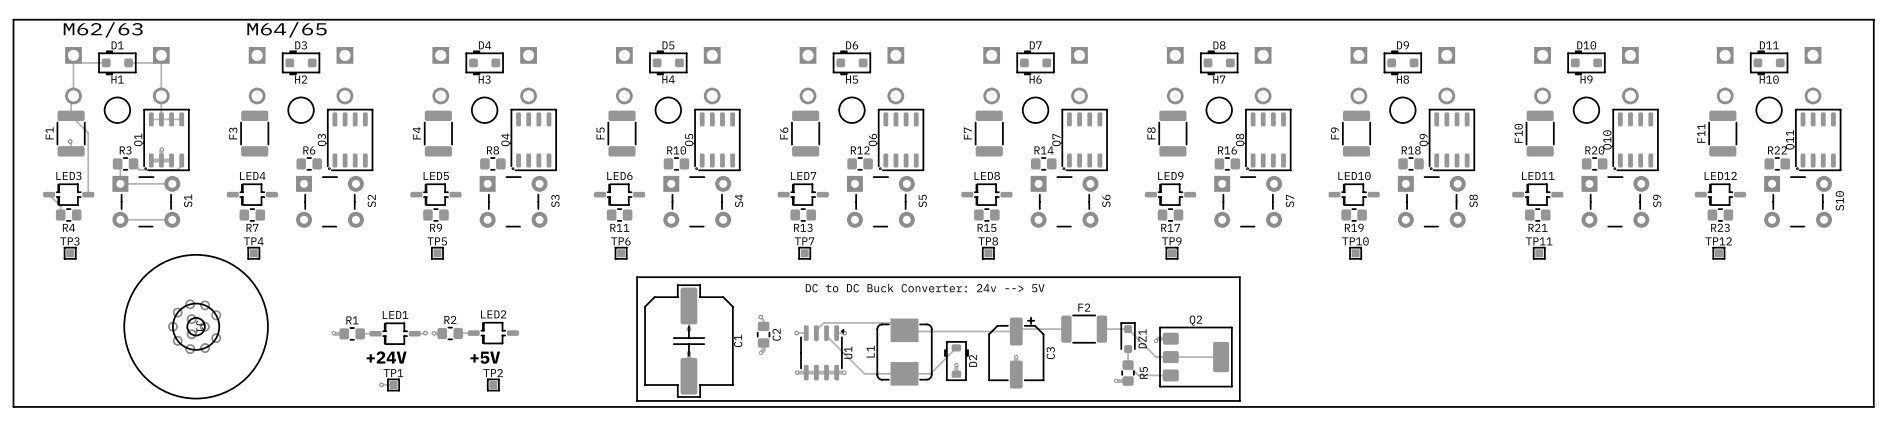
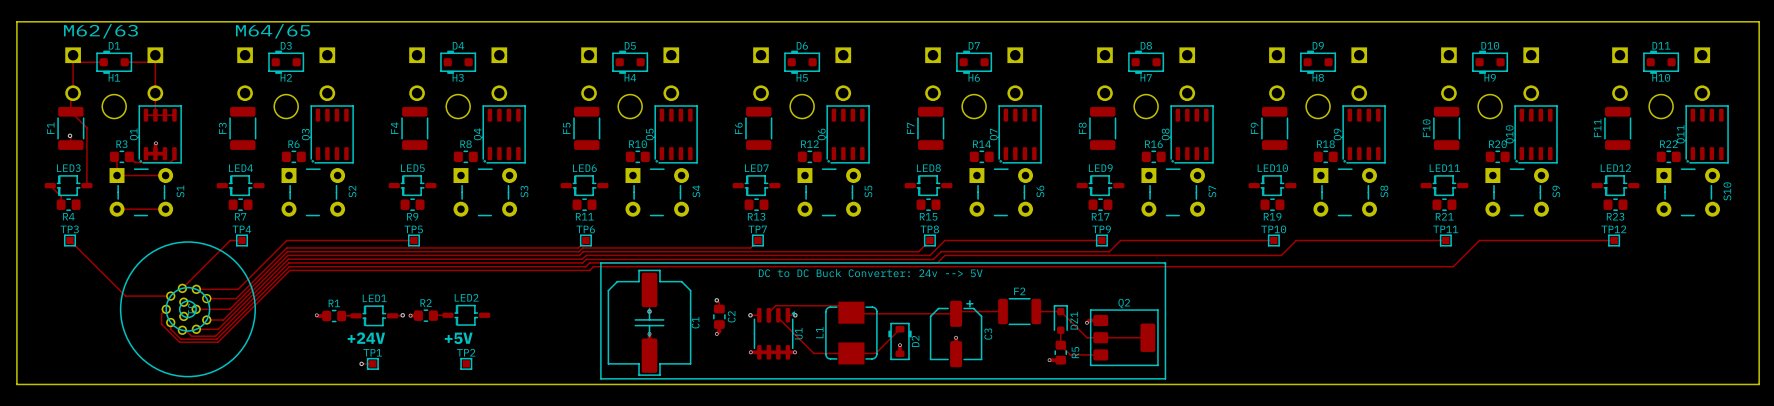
track: none -> (70, 240) (125, 296) (170, 296)
track: none -> (241, 240) (230, 240) (182, 288)
track: none -> (413, 240) (286, 240) (238, 289) (196, 289)
track: none -> (585, 240) (578, 247) (286, 247) (236, 298) (206, 298)
track: none -> (757, 240) (750, 247) (582, 247) (578, 251) (287, 251) (229, 309) (196, 309)
track: none -> (929, 240) (918, 251) (583, 251) (579, 255) (287, 255) (223, 320) (206, 320)
track: none -> (1101, 240) (944, 240) (929, 255) (585, 255) (582, 259) (288, 259) (218, 329) (196, 329)
track: none -> (1273, 240) (1120, 240) (1109, 251) (941, 251) (933, 259) (586, 259) (582, 262) (288, 262) (215, 336) (191, 336) (185, 330) (182, 330)
track: none -> (1445, 240) (1296, 240) (1281, 255) (944, 255) (937, 262) (589, 262) (585, 266) (289, 266) (216, 339) (180, 339) (170, 329) (170, 322)
track: none -> (1614, 240) (1479, 240) (1453, 266) (593, 266) (589, 270) (289, 270) (218, 342) (179, 342) (161, 324) (161, 313) (166, 309)

